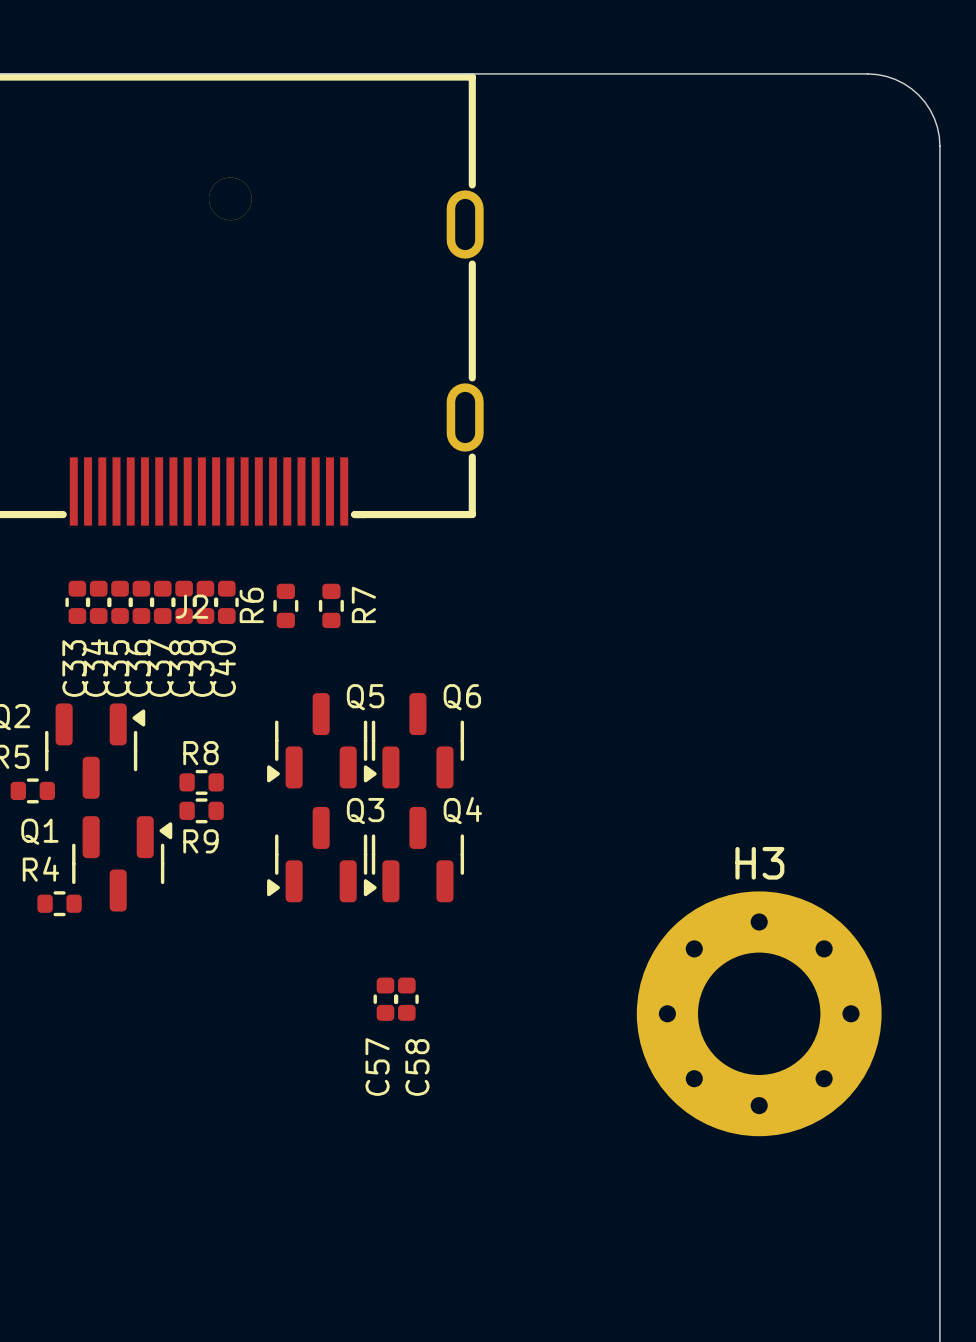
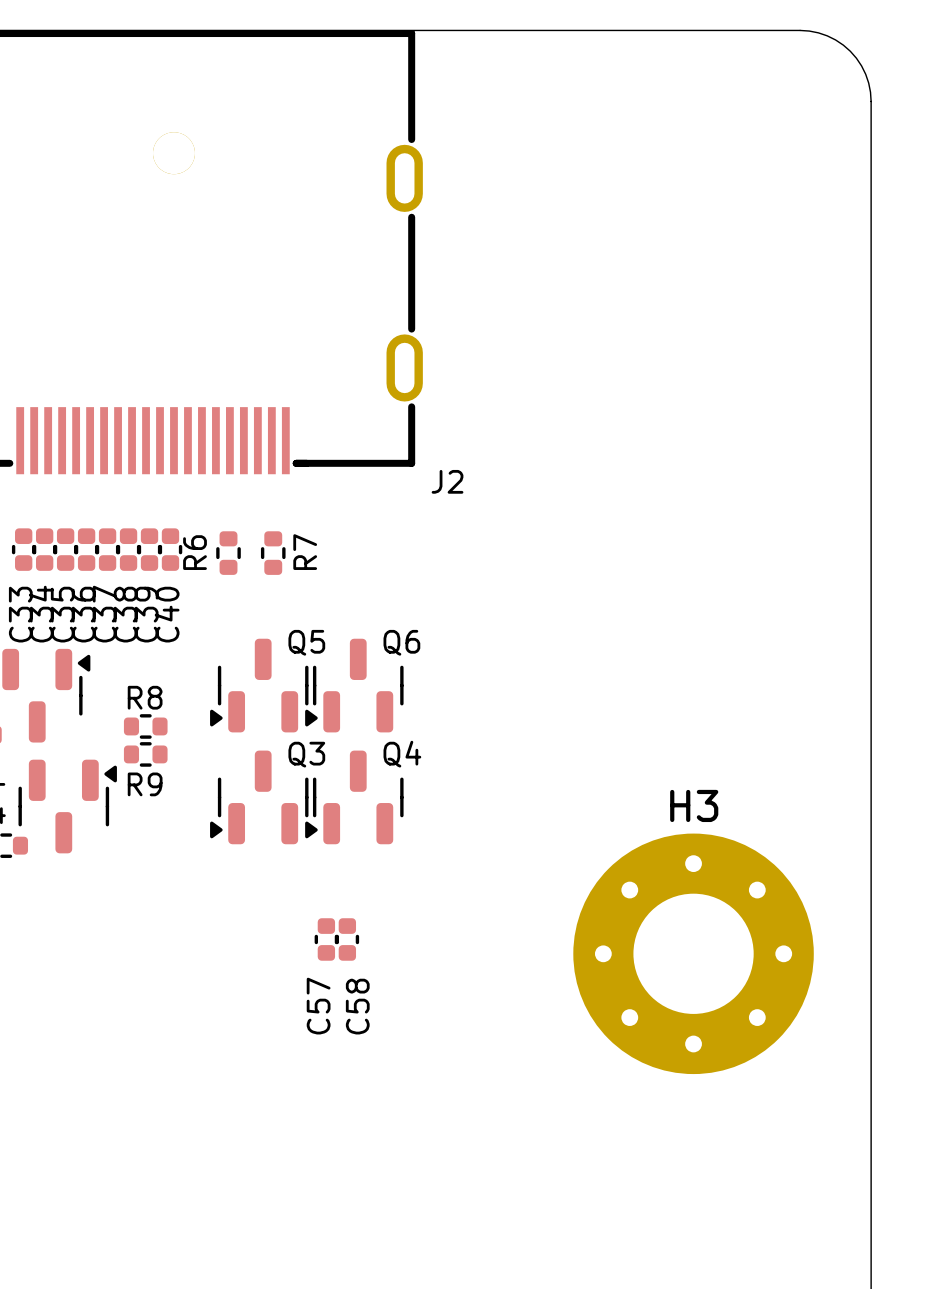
J2 name position: J2 (192, 606) -> J2 (447, 481)

